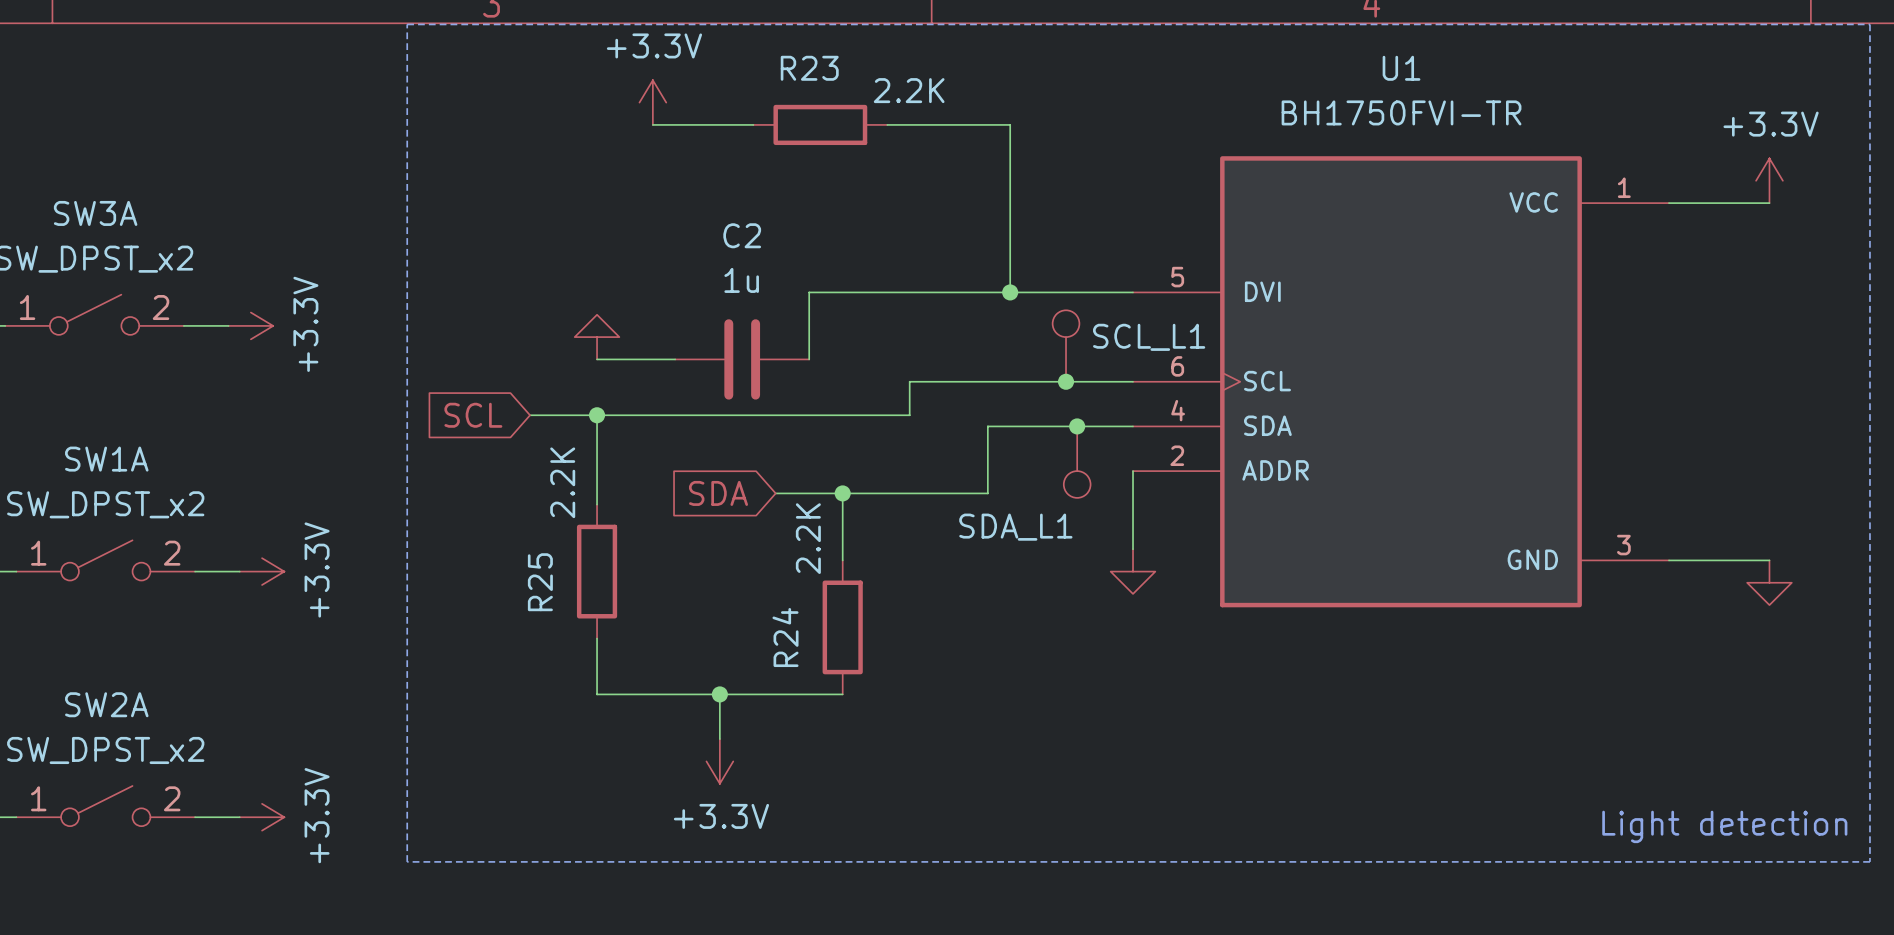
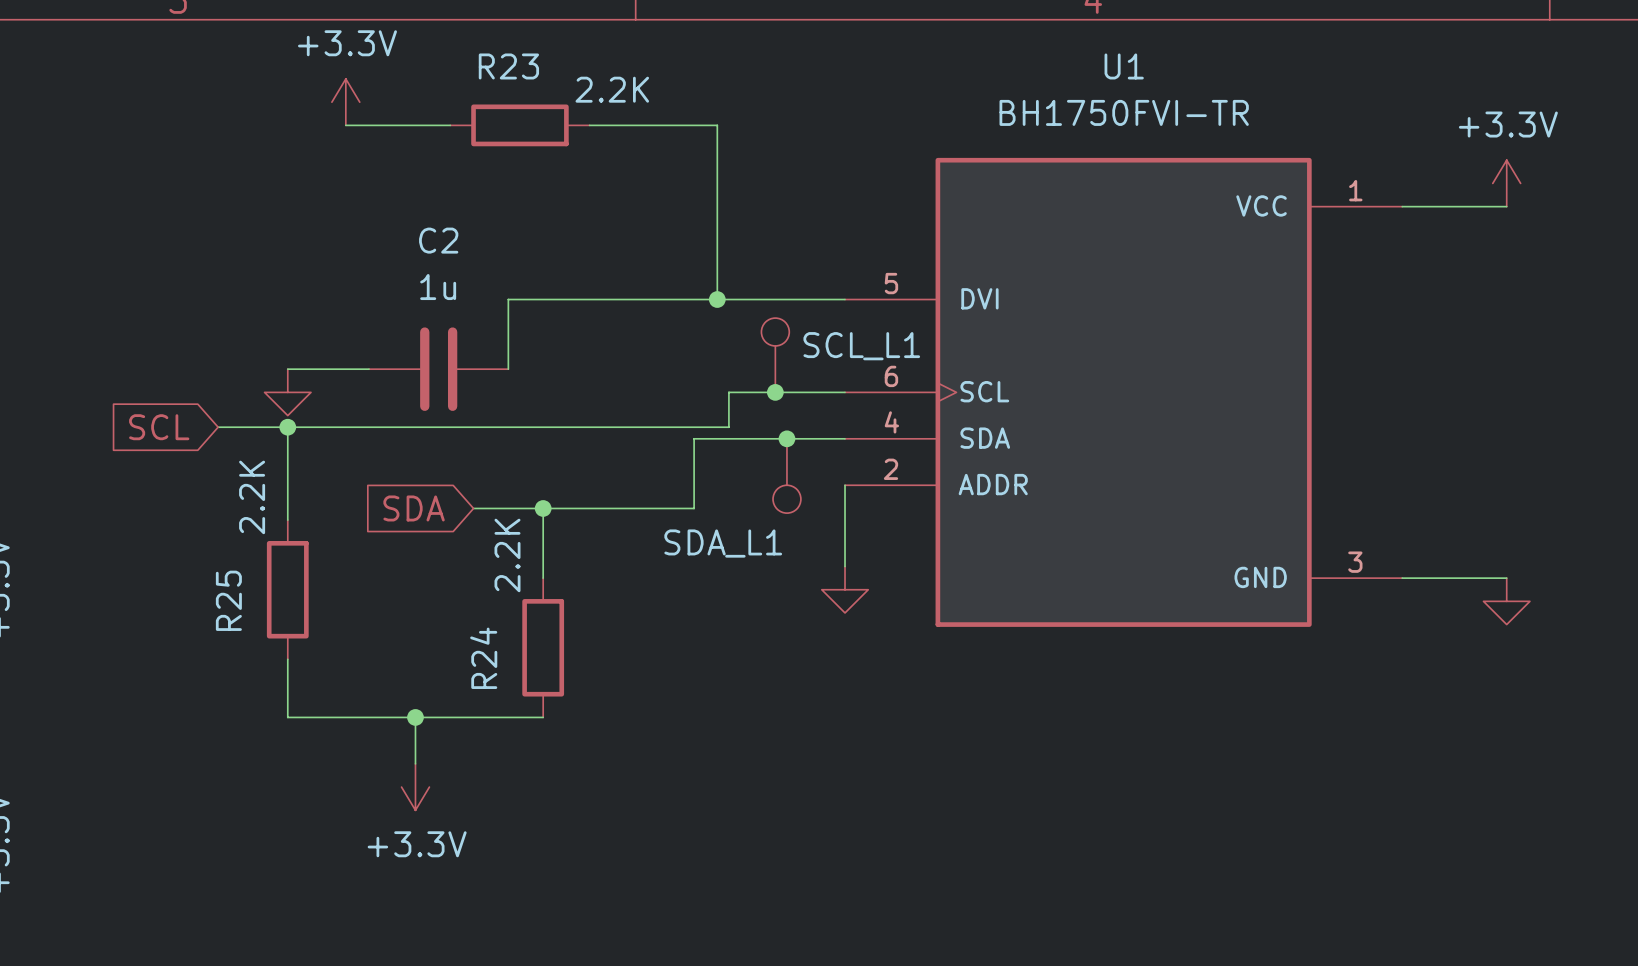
line: (407, 24) (1869, 24) (1869, 861) (407, 861) (407, 24) -> none
power symbol rotation: 0° (597, 337) -> 180° (287, 392)
power symbol position: (597, 337) -> (287, 392)
wire: (1021, 381) (909, 381) (909, 415) -> (728, 392) (728, 427) (612, 427)
text: Light detection (1724, 826) -> none

